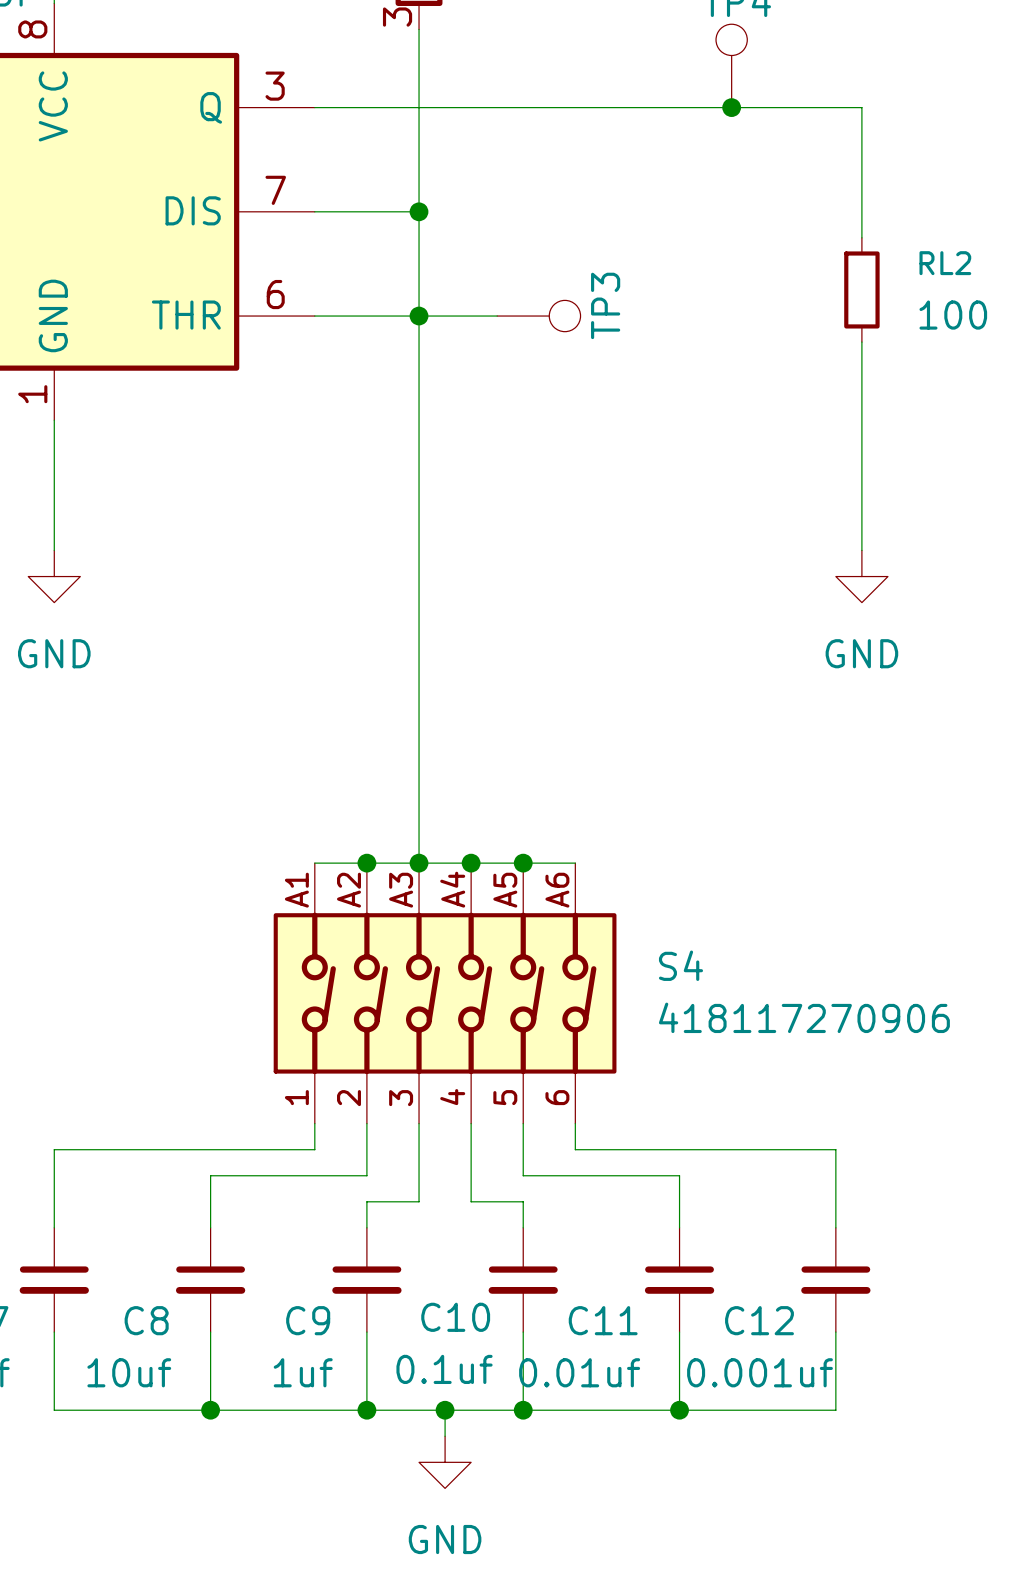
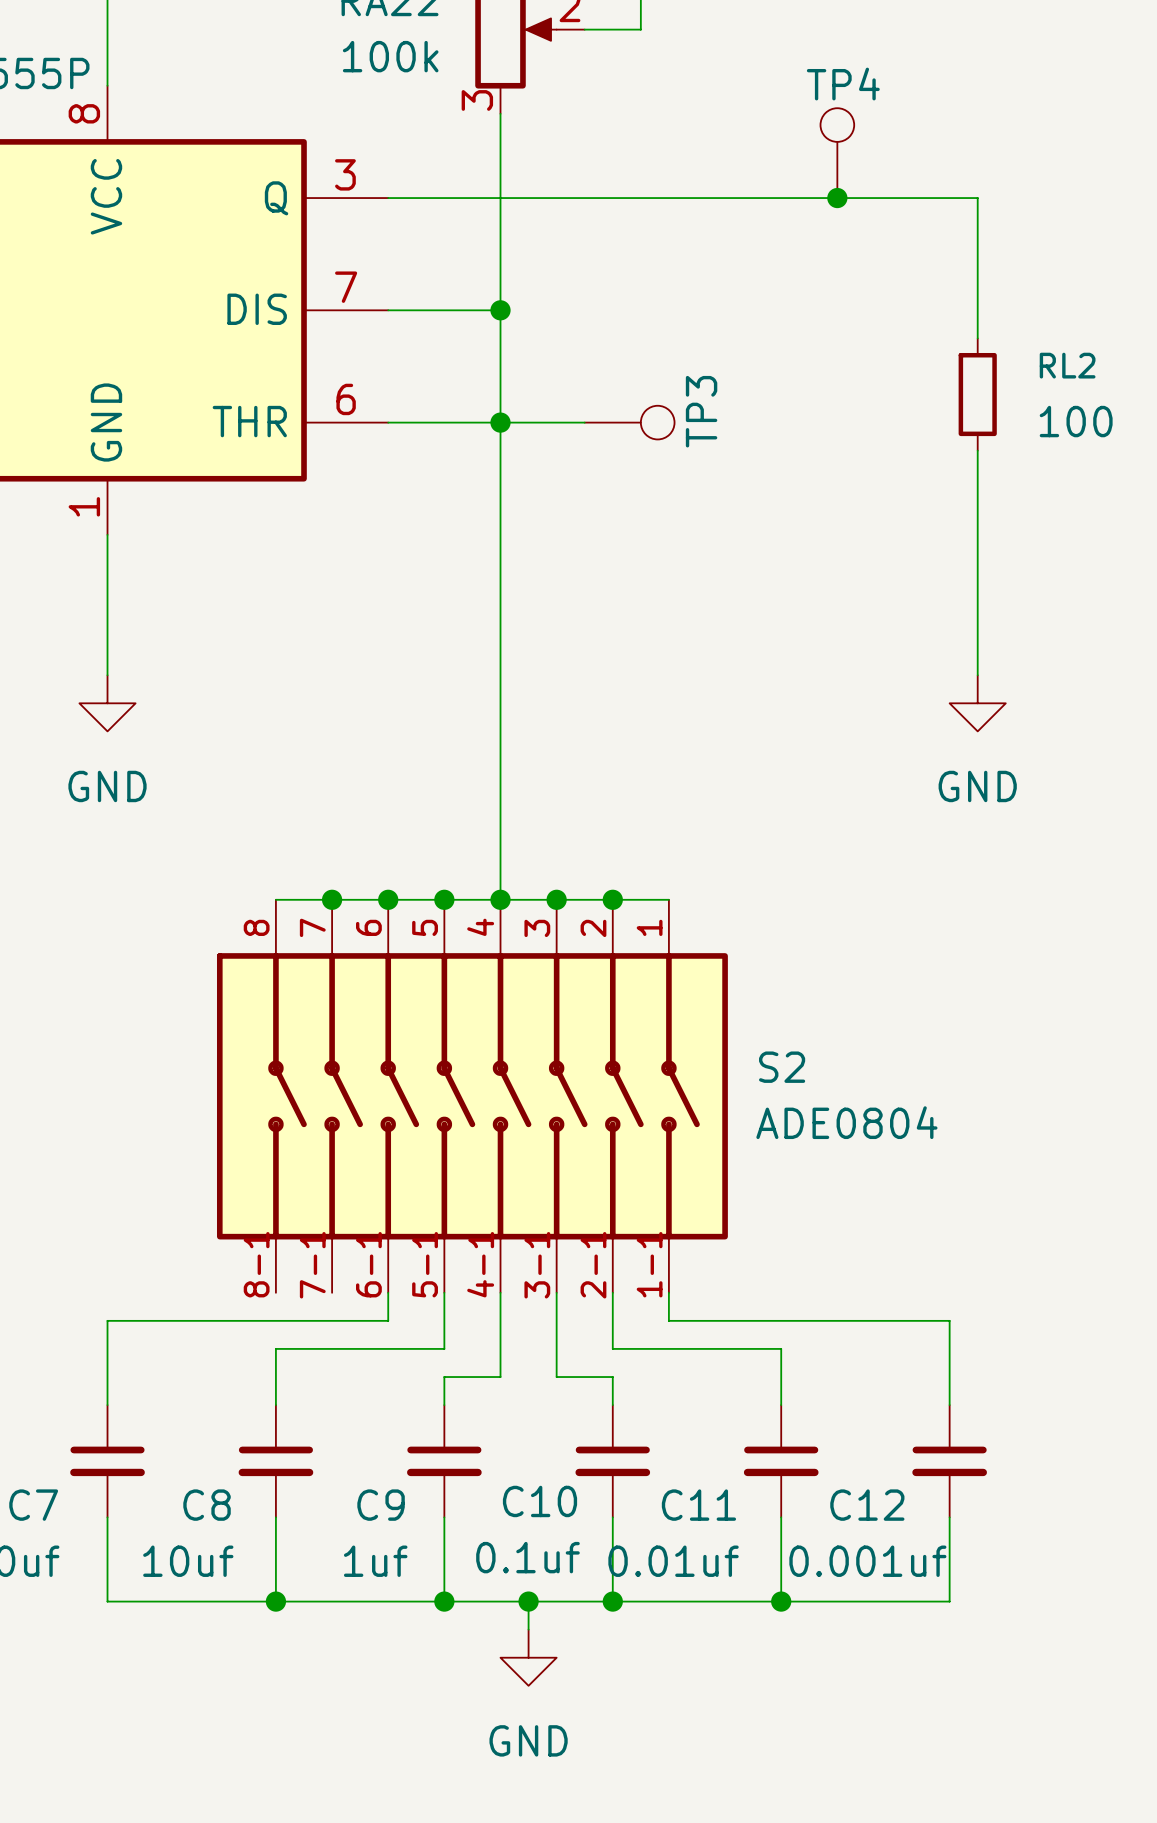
wire: none -> (275, 899) (668, 899)
junction: none -> (332, 899)
junction: none -> (388, 899)
junction: none -> (444, 899)
junction: none -> (500, 899)
junction: none -> (556, 899)
junction: none -> (612, 899)
junction: (366, 863) -> none
junction: (419, 863) -> none
junction: (471, 863) -> none
junction: (523, 863) -> none
S2: none -> ADE0804 (472, 1096)
S4: 418117270906 (445, 993) -> none

